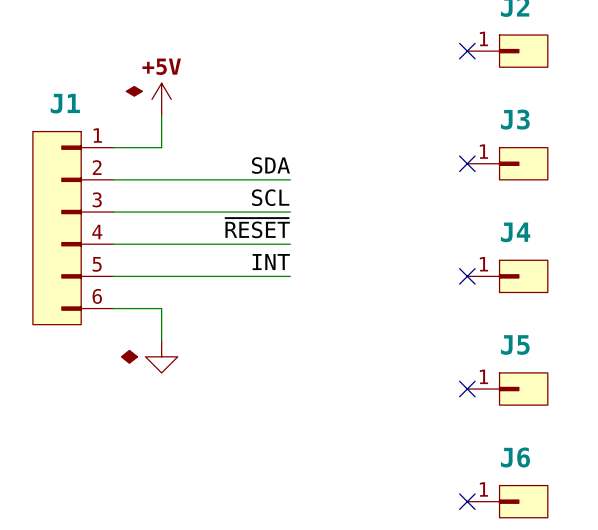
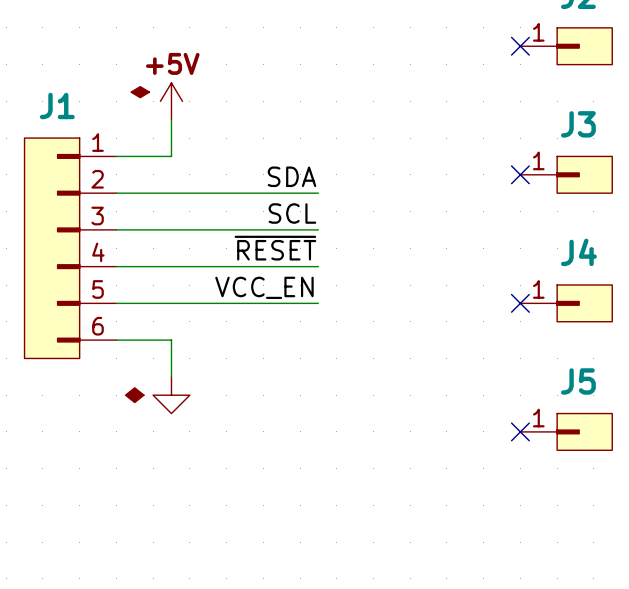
label: INT (271, 262) -> VCC_EN (264, 287)
no-connect mark: (467, 501) -> none
J6: (507, 501) -> none

